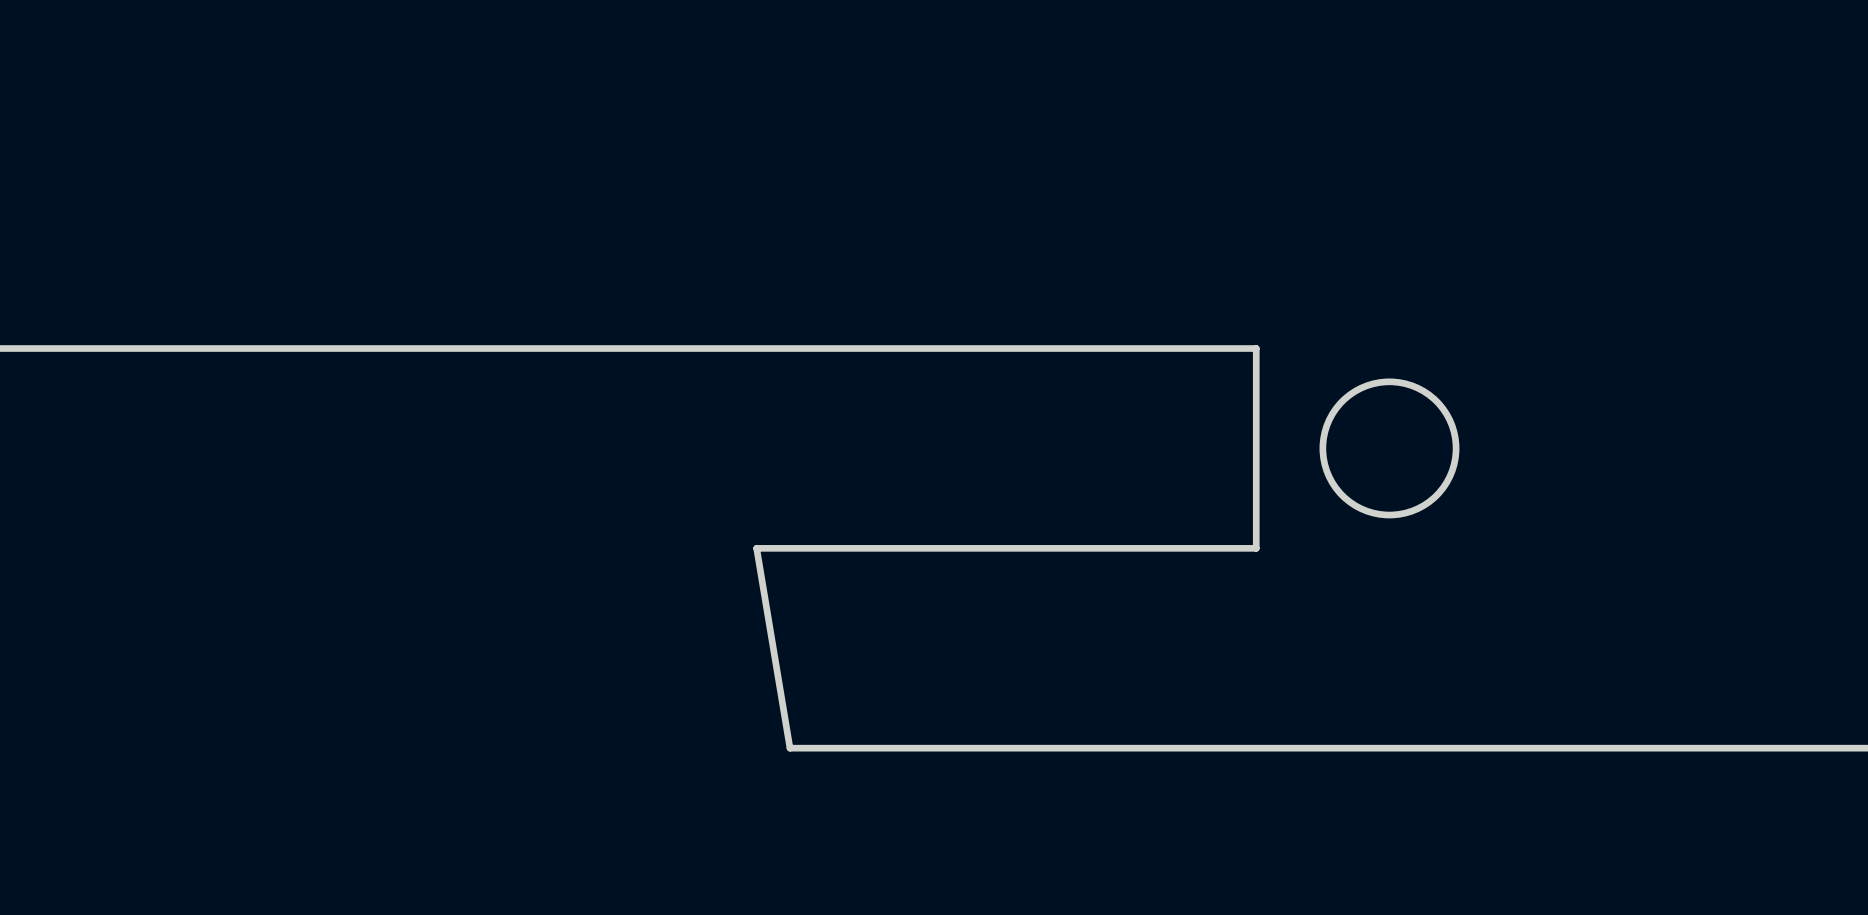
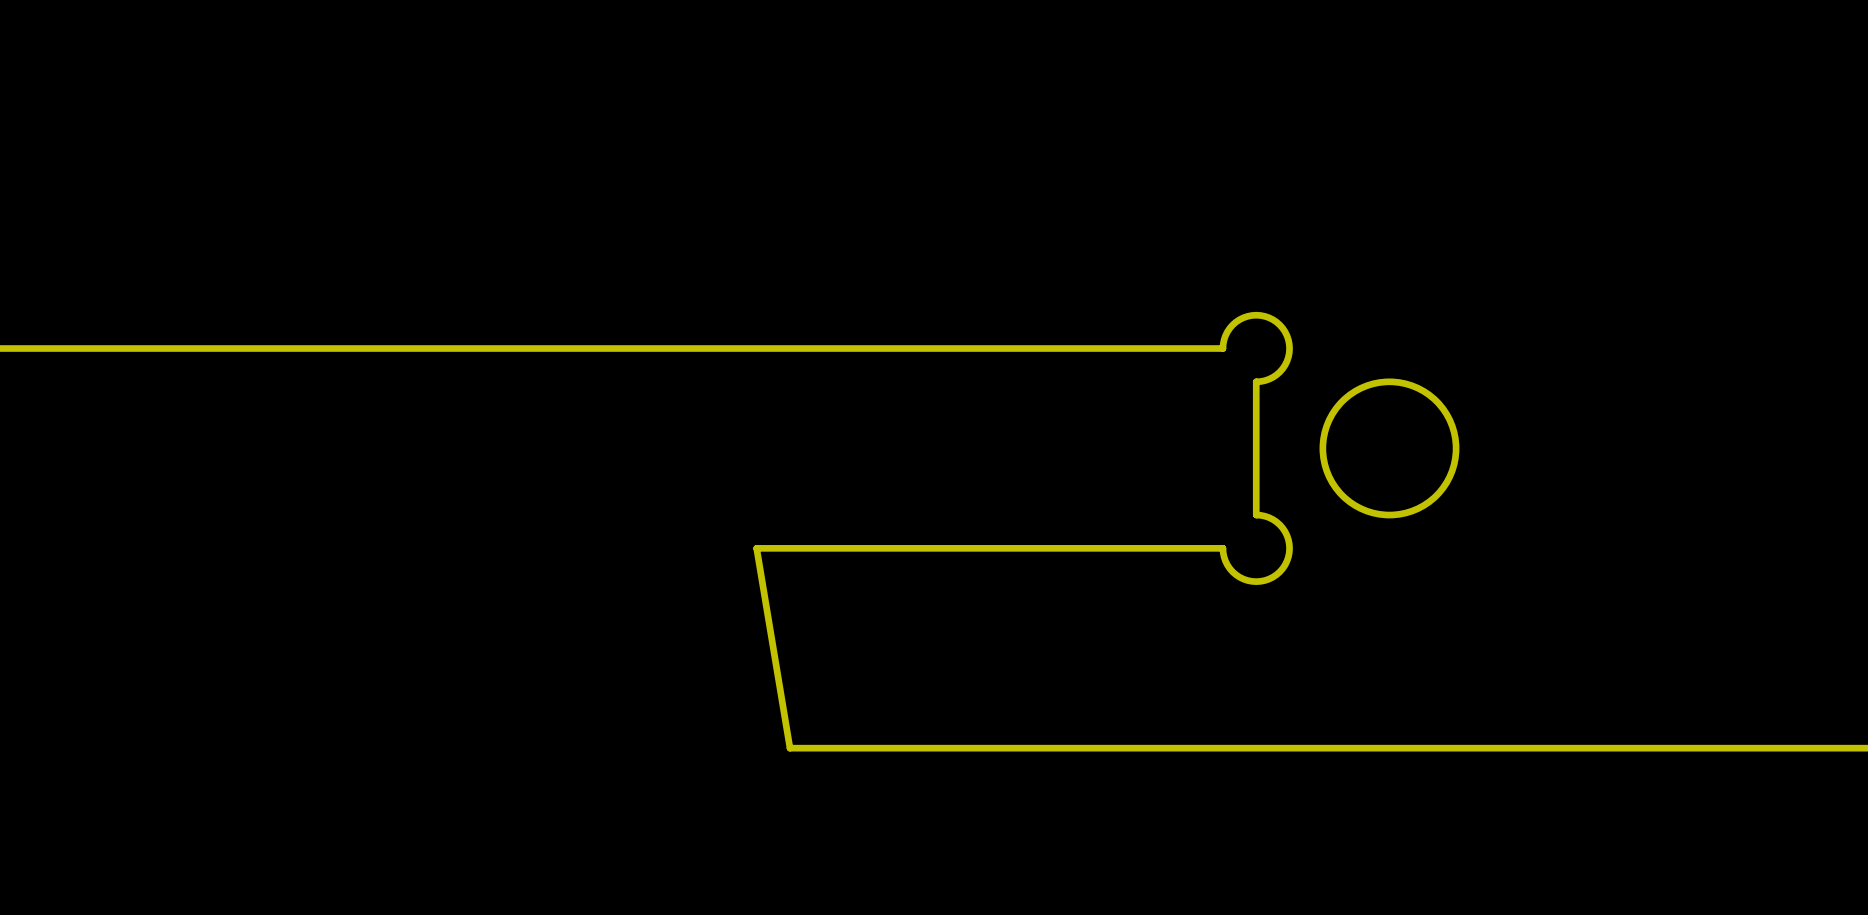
board edge: (1222, 348) (1256, 348) (1256, 381) -> (1222, 348) (1225, 335) (1229, 328) (1243, 317) (1260, 315) (1269, 317) (1279, 324) (1287, 335) (1289, 344) (1287, 361) (1276, 374) (1269, 379) (1256, 381)
board edge: (1256, 515) (1256, 548) (1222, 548) -> (1256, 515) (1264, 516) (1276, 521) (1287, 535) (1289, 552) (1285, 564) (1279, 571) (1264, 580) (1256, 581) (1243, 579) (1229, 568) (1225, 561) (1222, 548)

